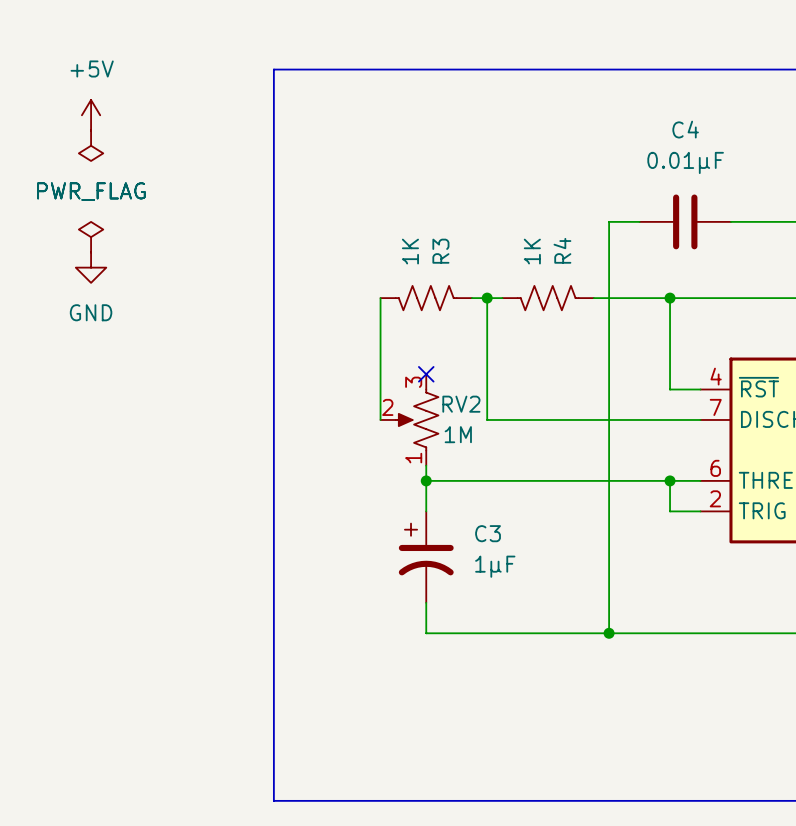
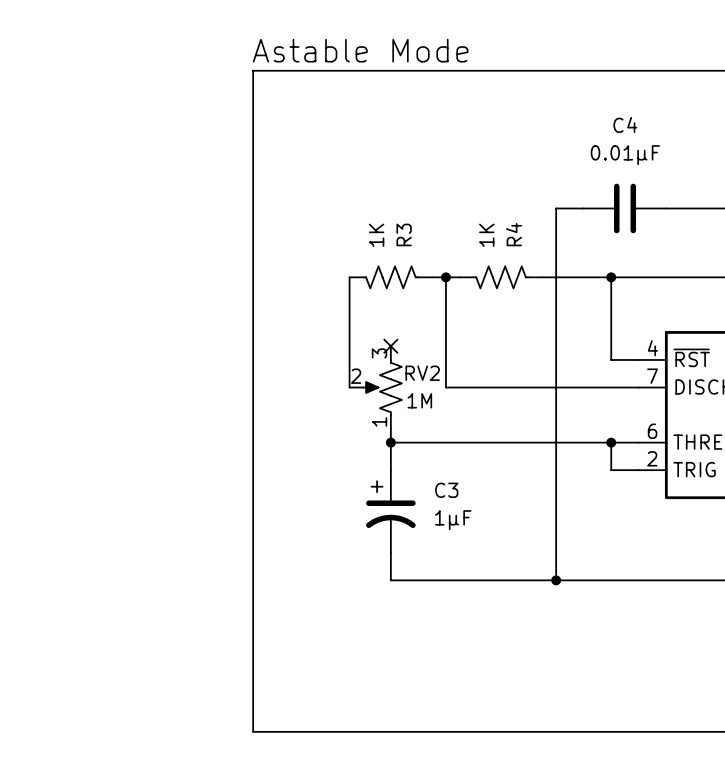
text: none -> Astable Mode (360, 50)
power symbol: +5V (91, 115) -> none
power symbol: PWR_FLAG (91, 145) -> none
power symbol: PWR_FLAG (91, 237) -> none
power symbol: GND (91, 267) -> none

